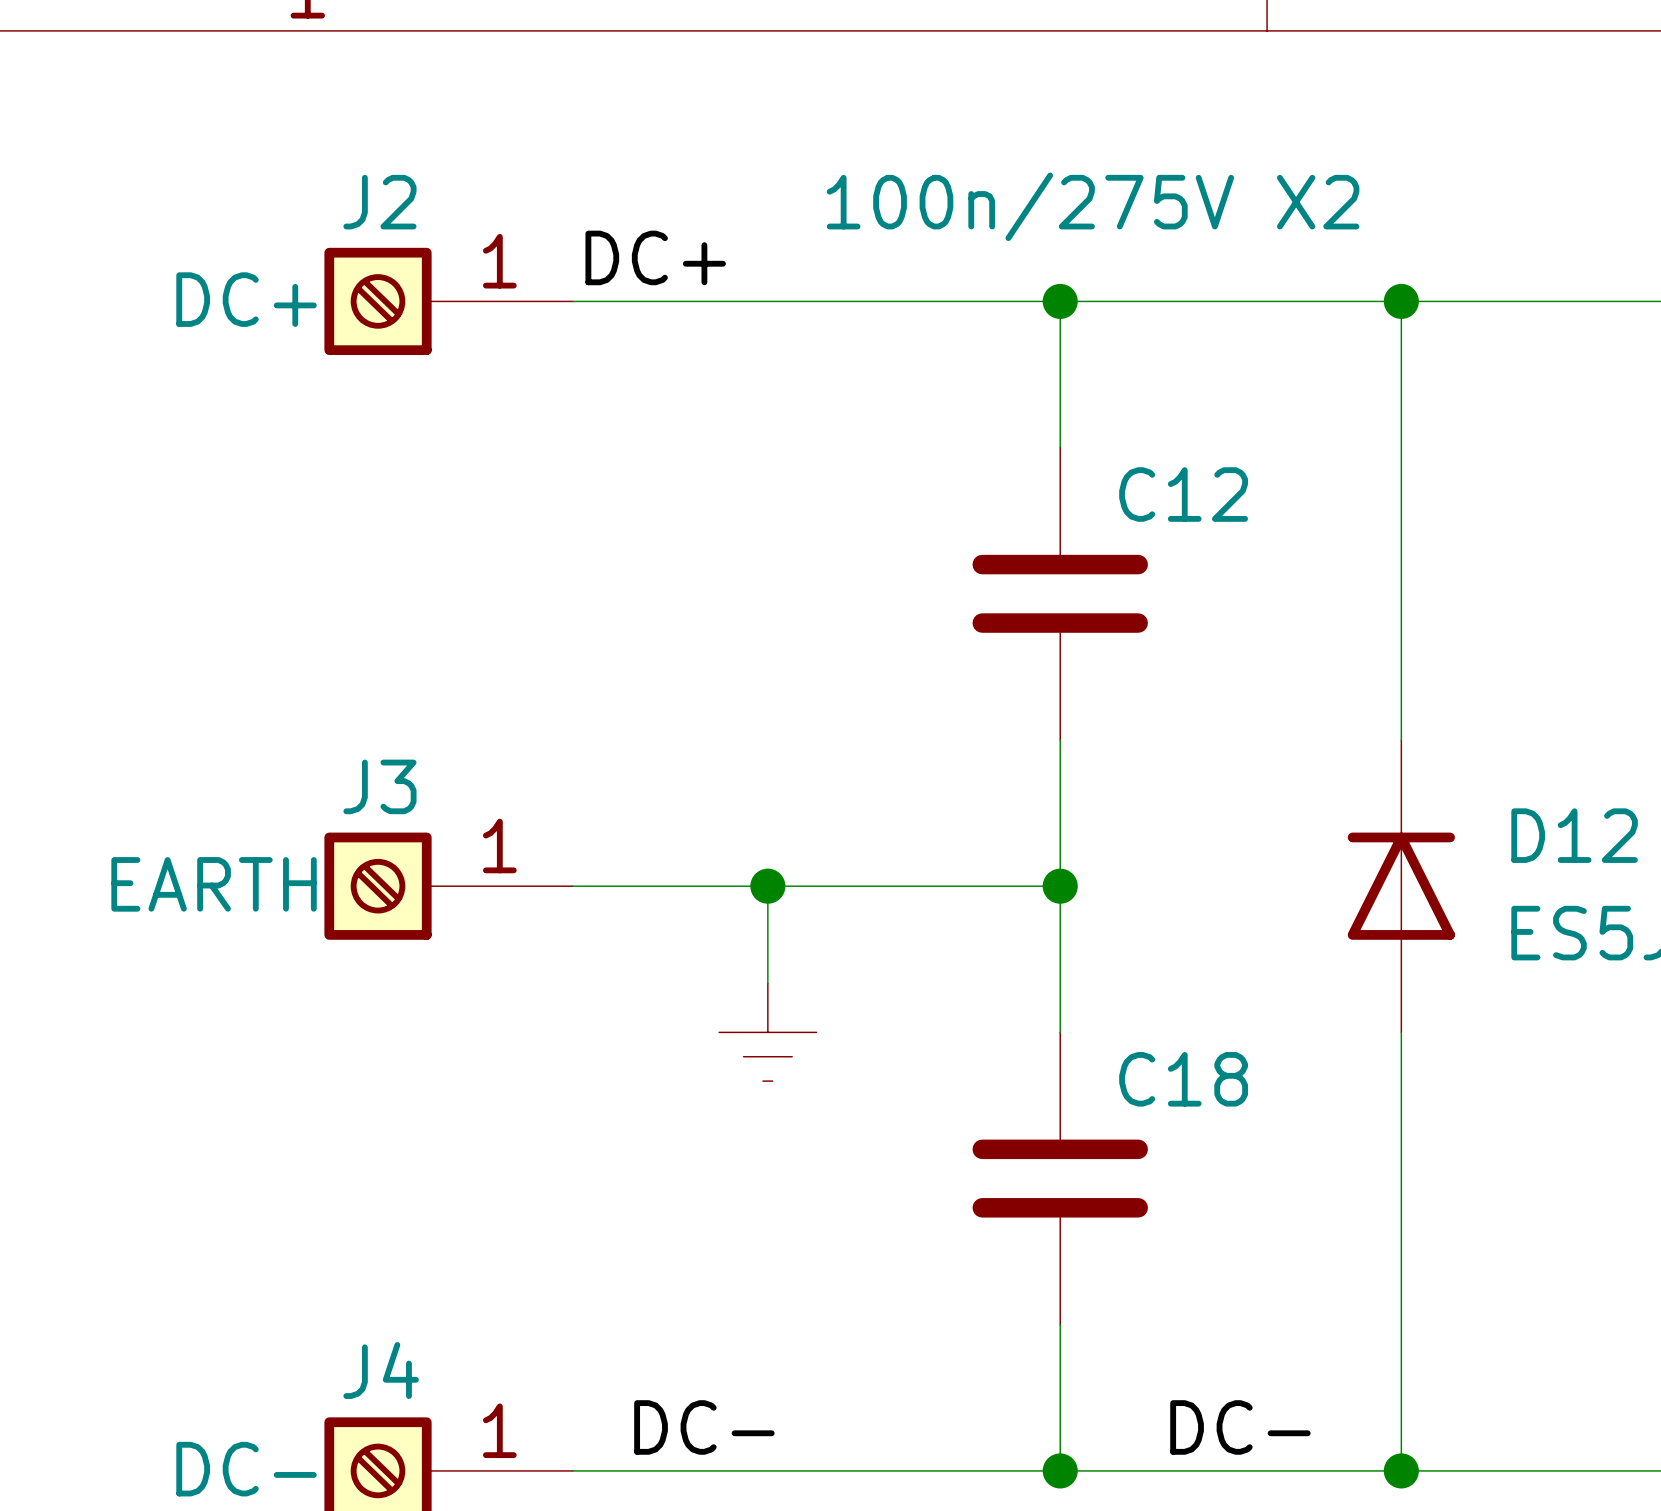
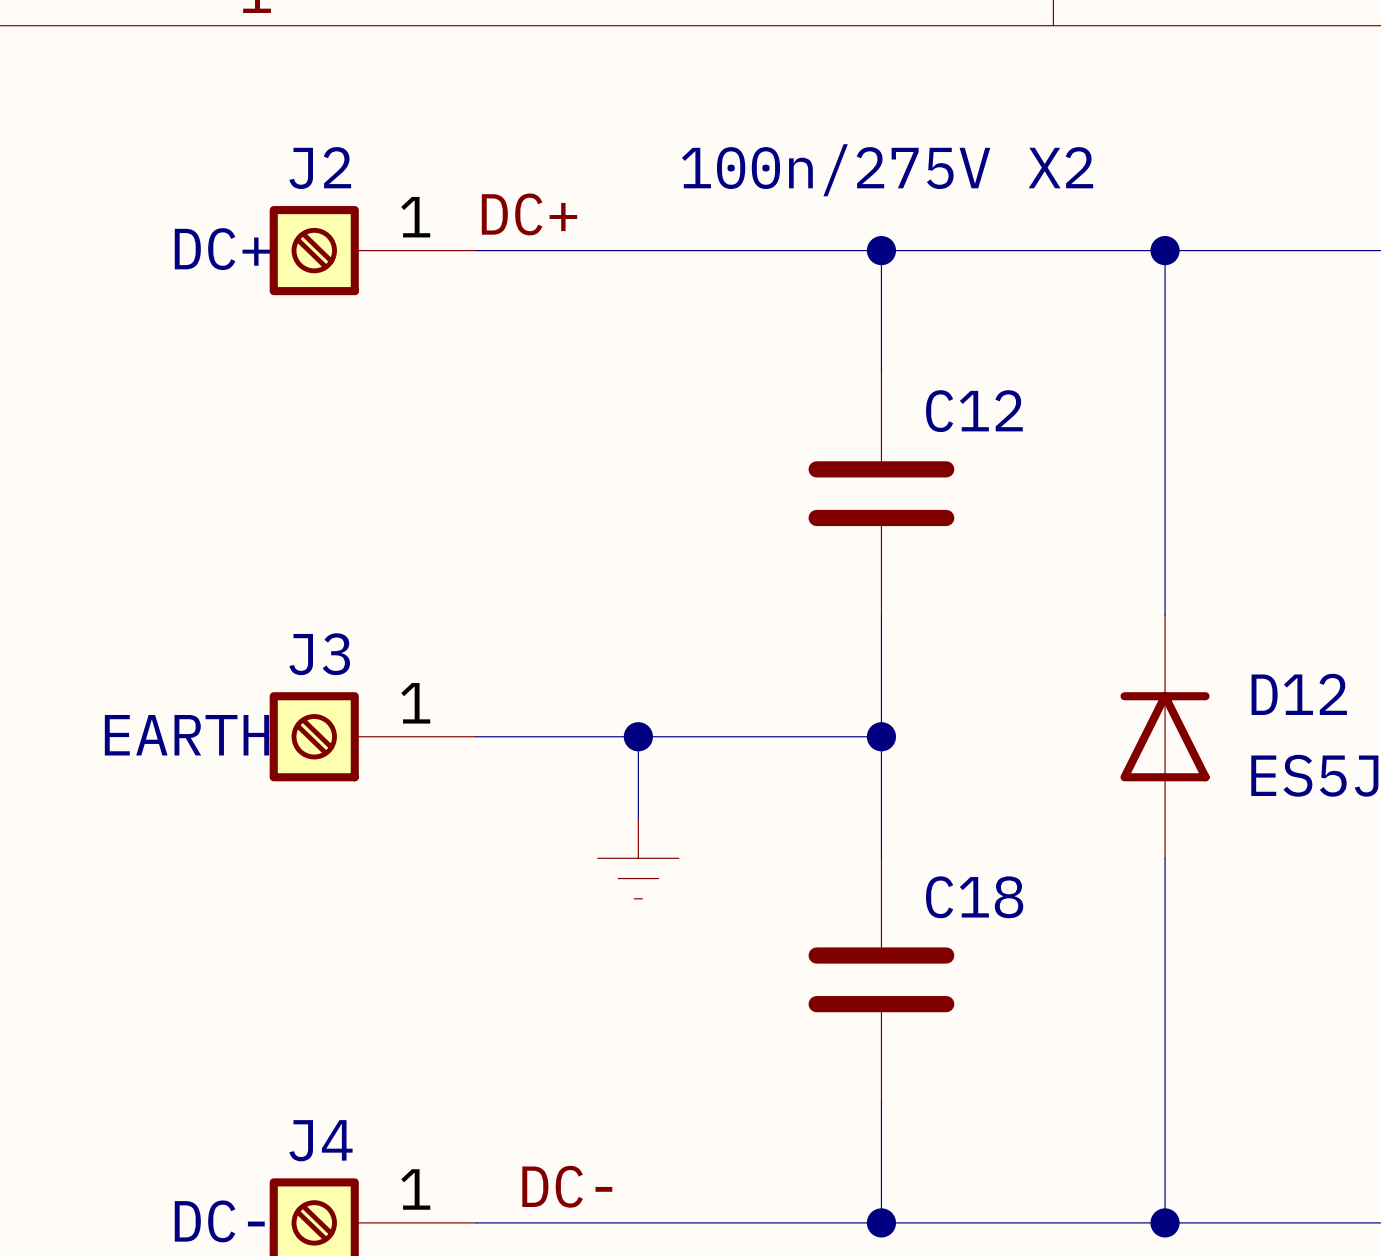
label: DC- (1240, 1427) -> none

